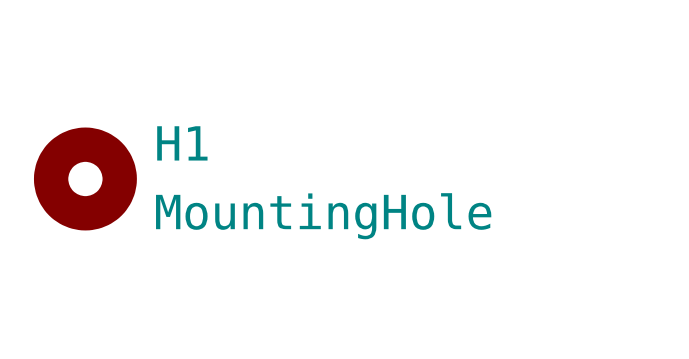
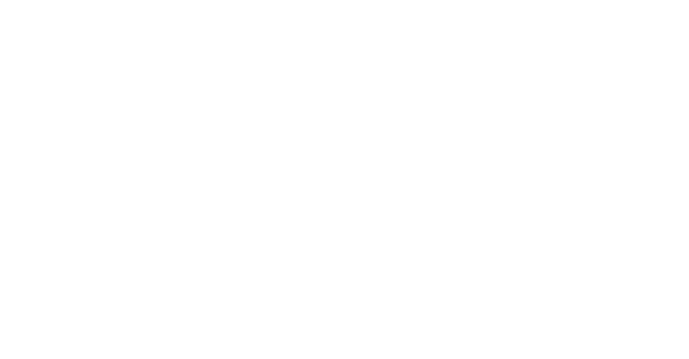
H1: MountingHole (85, 178) -> none

